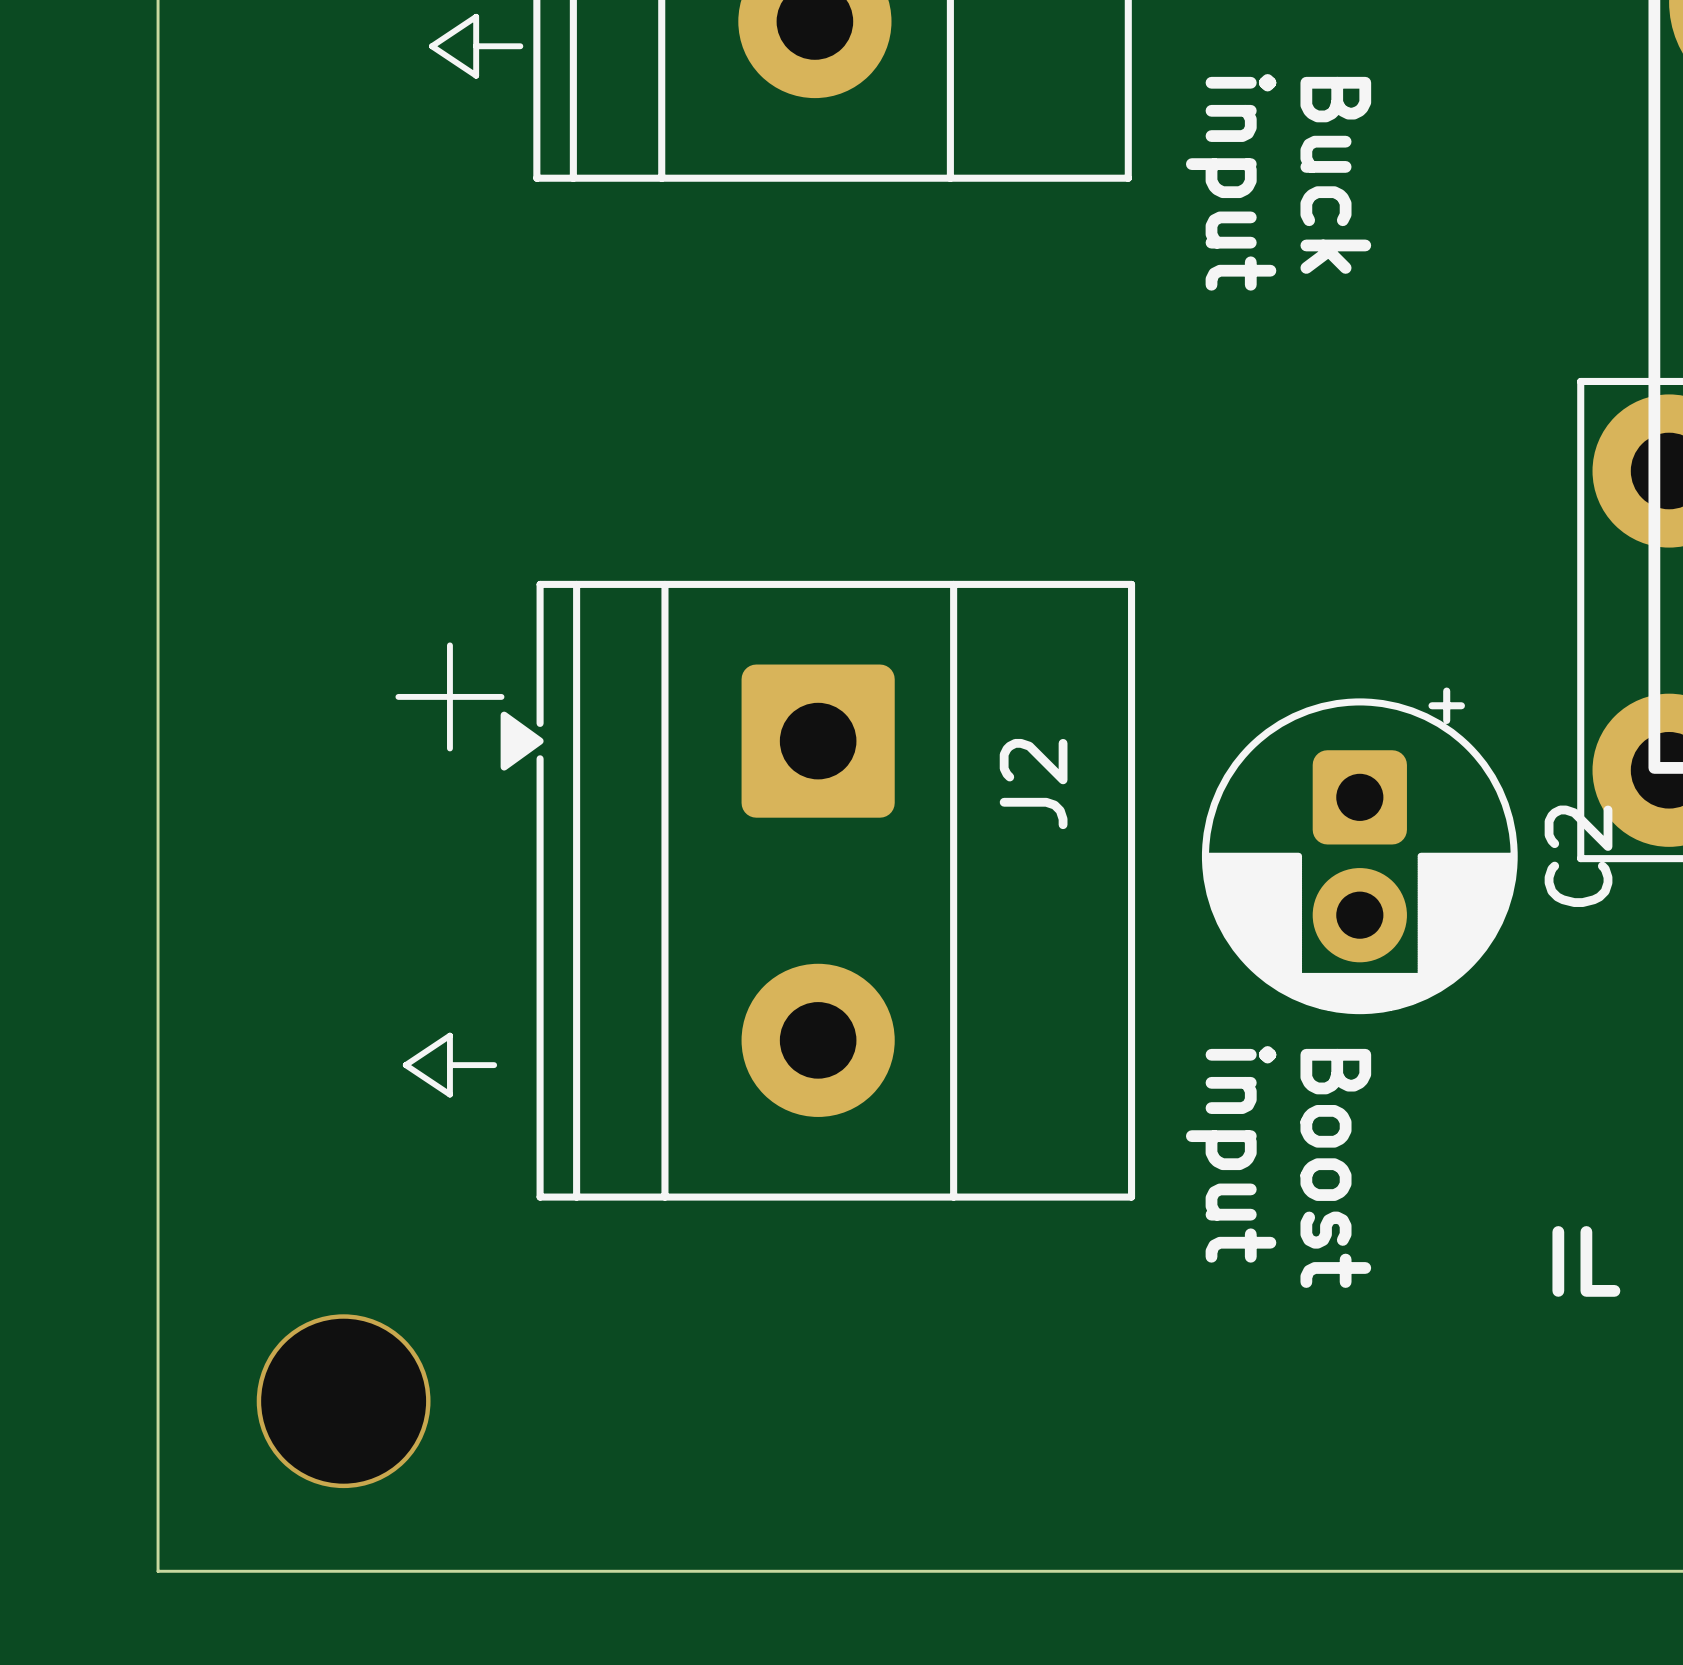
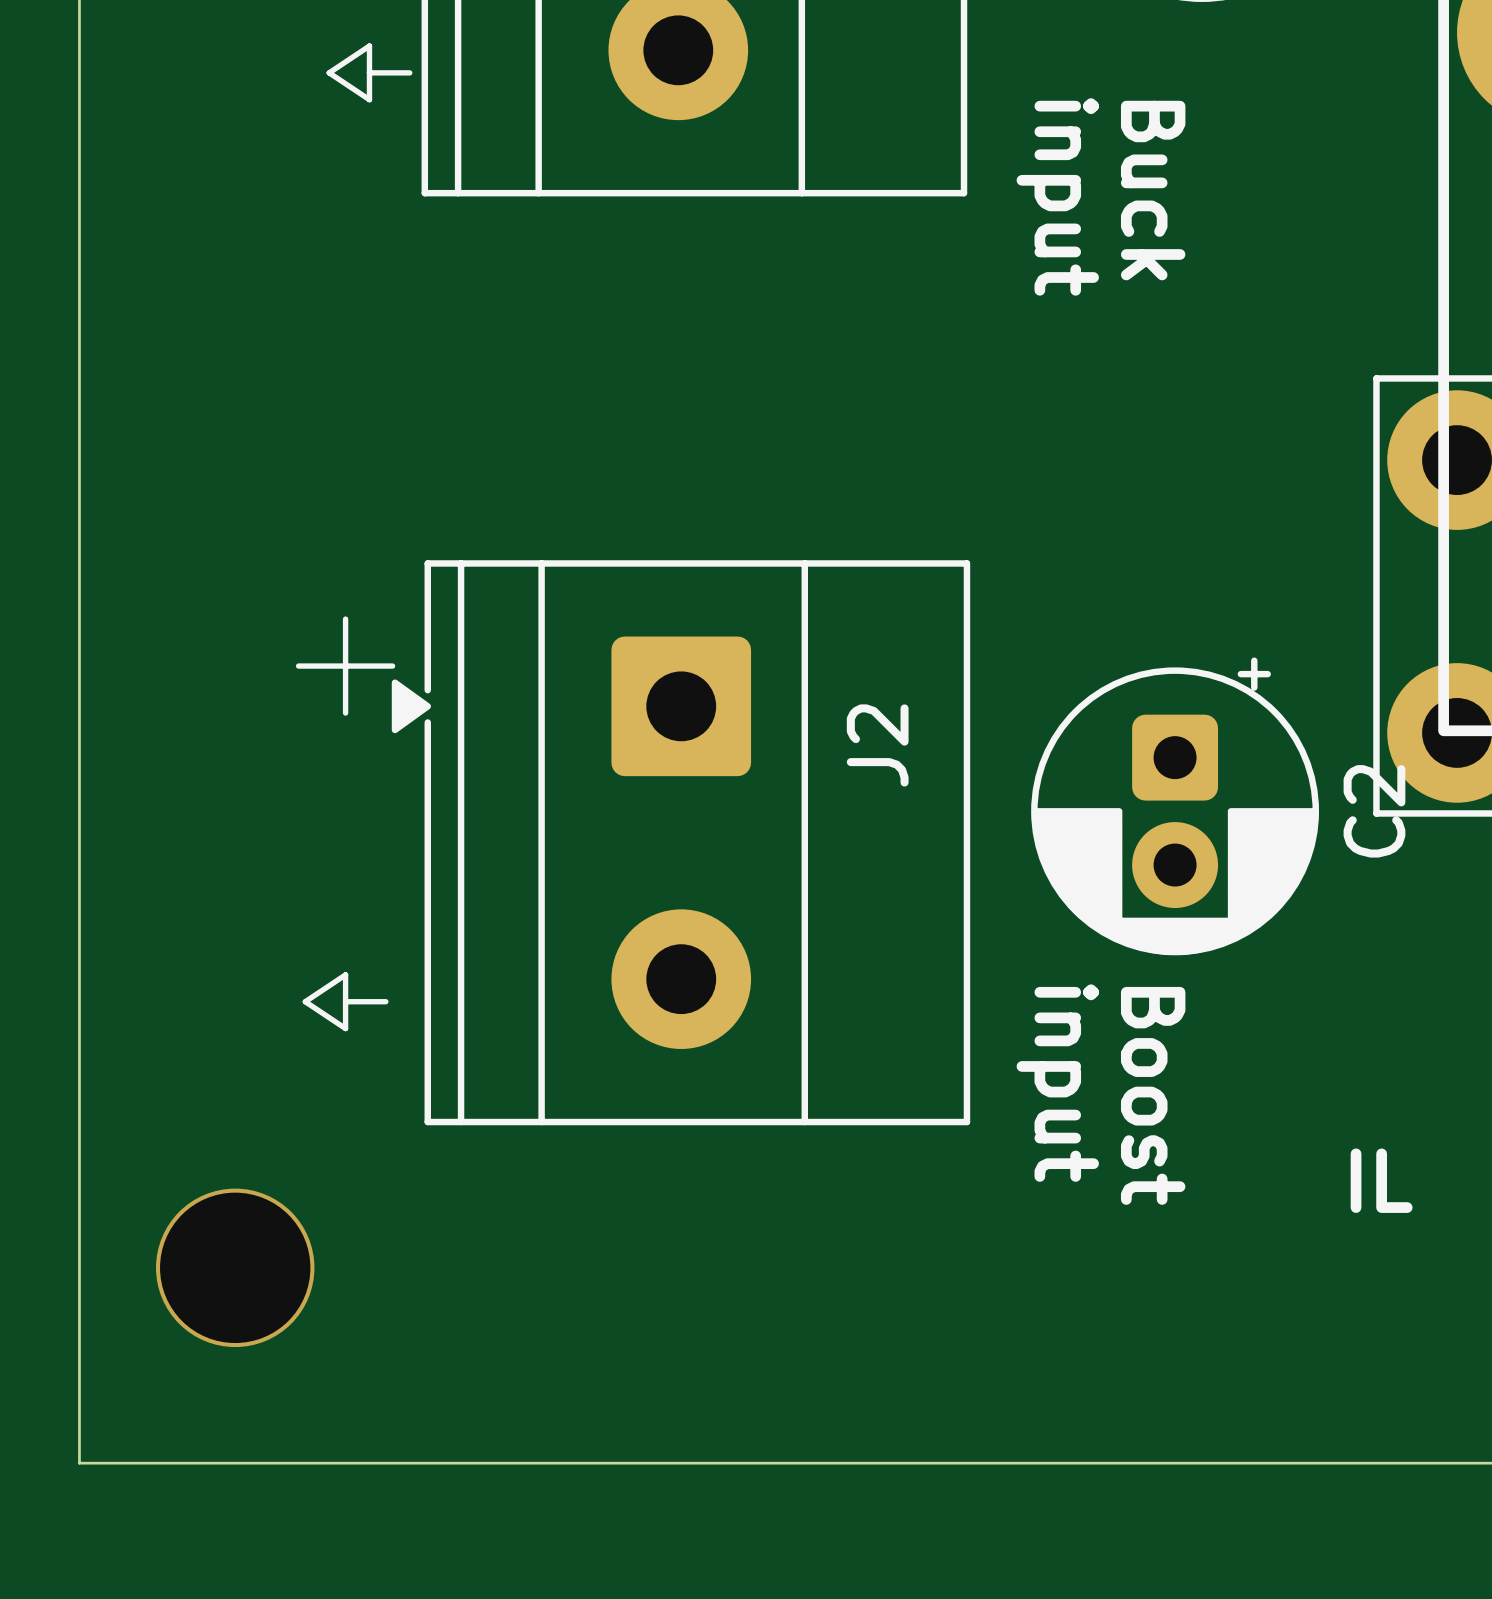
via position: (343, 1401) -> (235, 1267)

